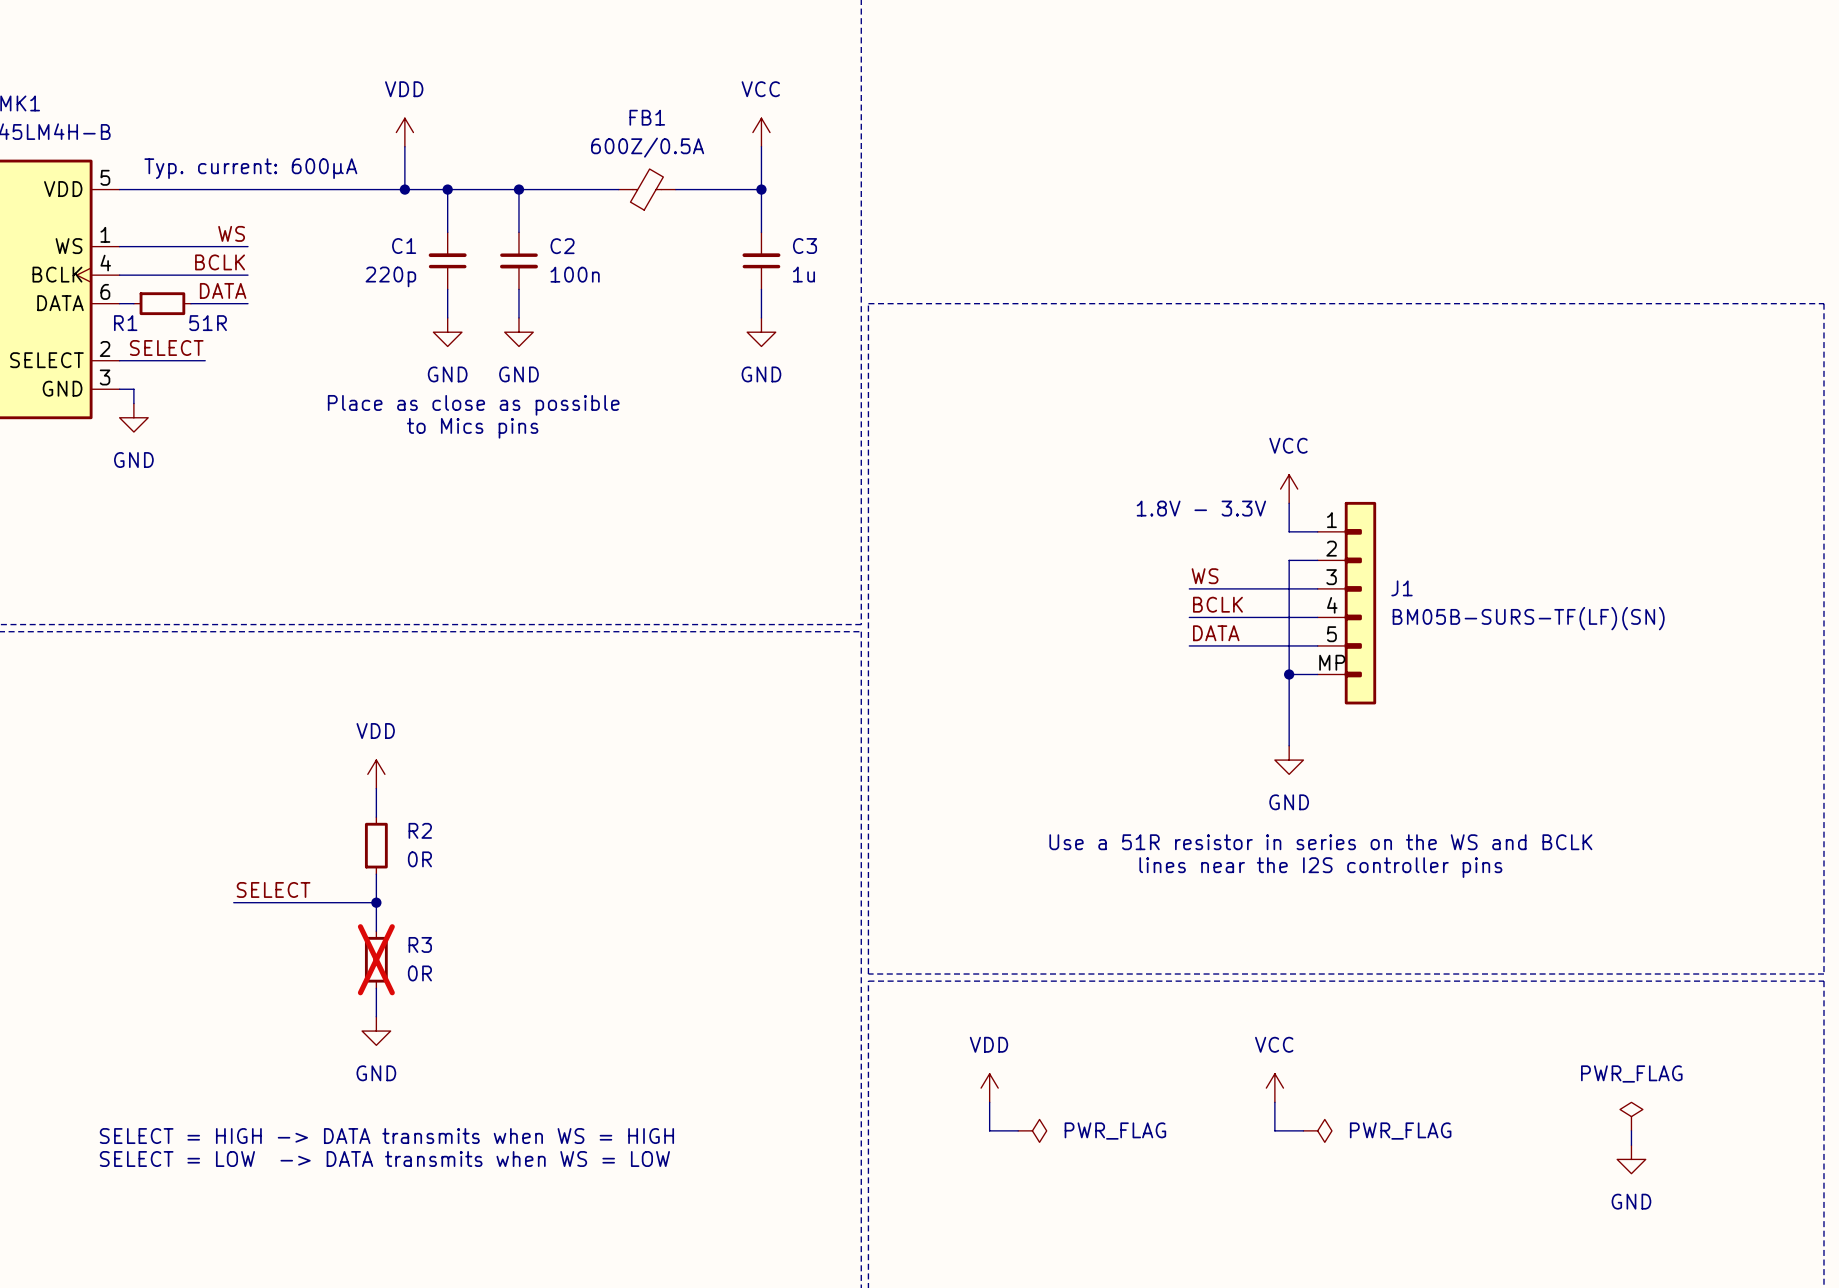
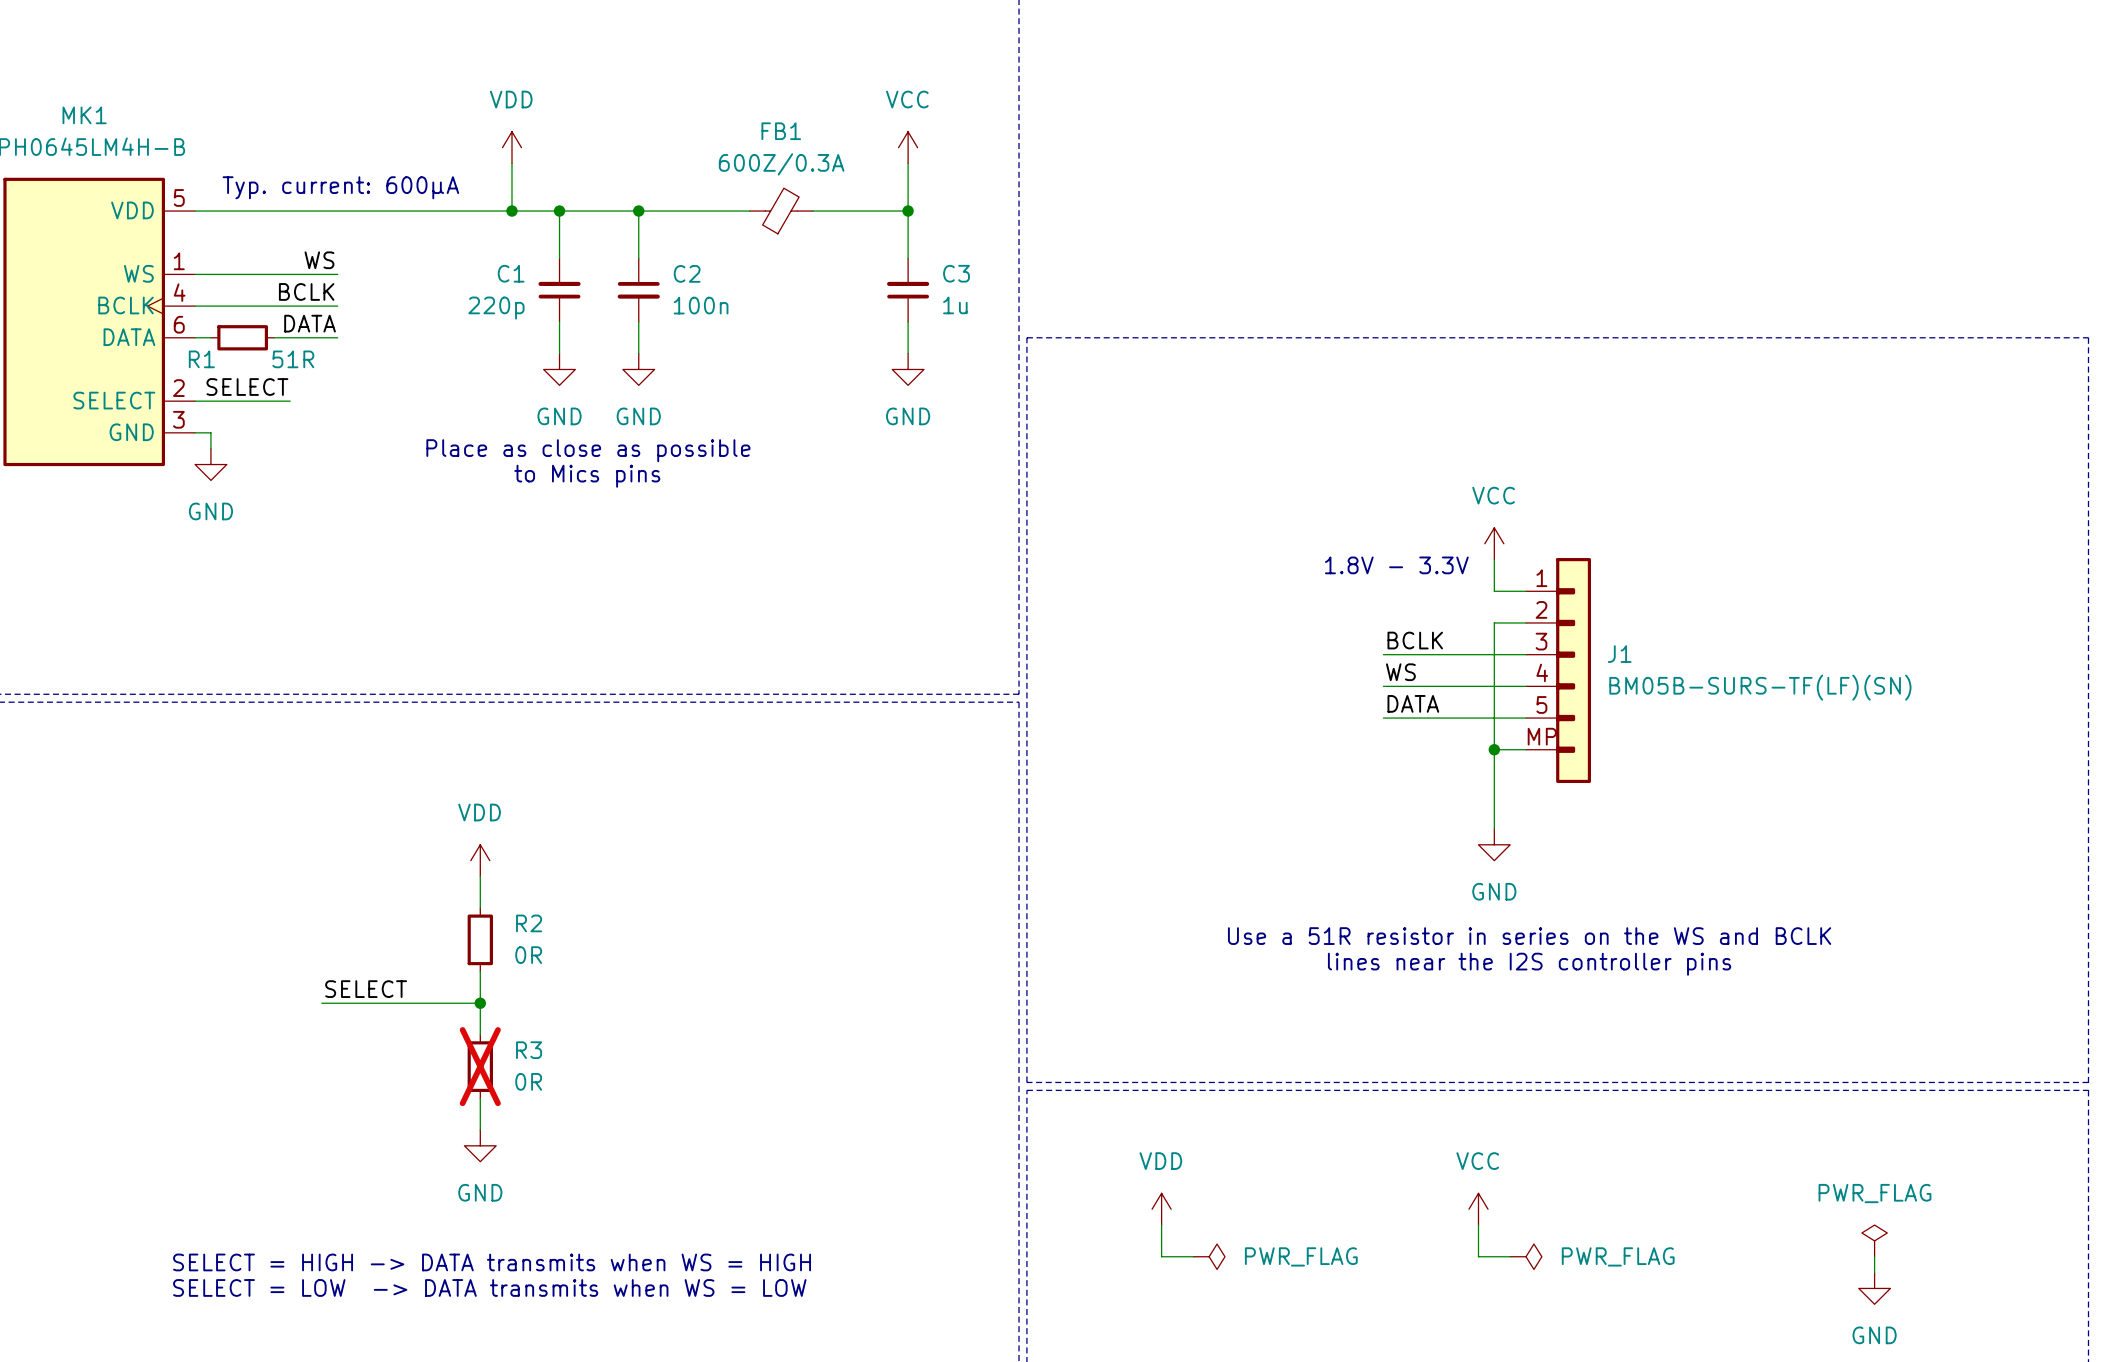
FB1 text: 600Z/0.5A (647, 147) -> 600Z/0.3A (781, 164)
label: WS (1205, 576) -> BCLK (1415, 640)
label: BCLK (1217, 604) -> WS (1400, 672)

